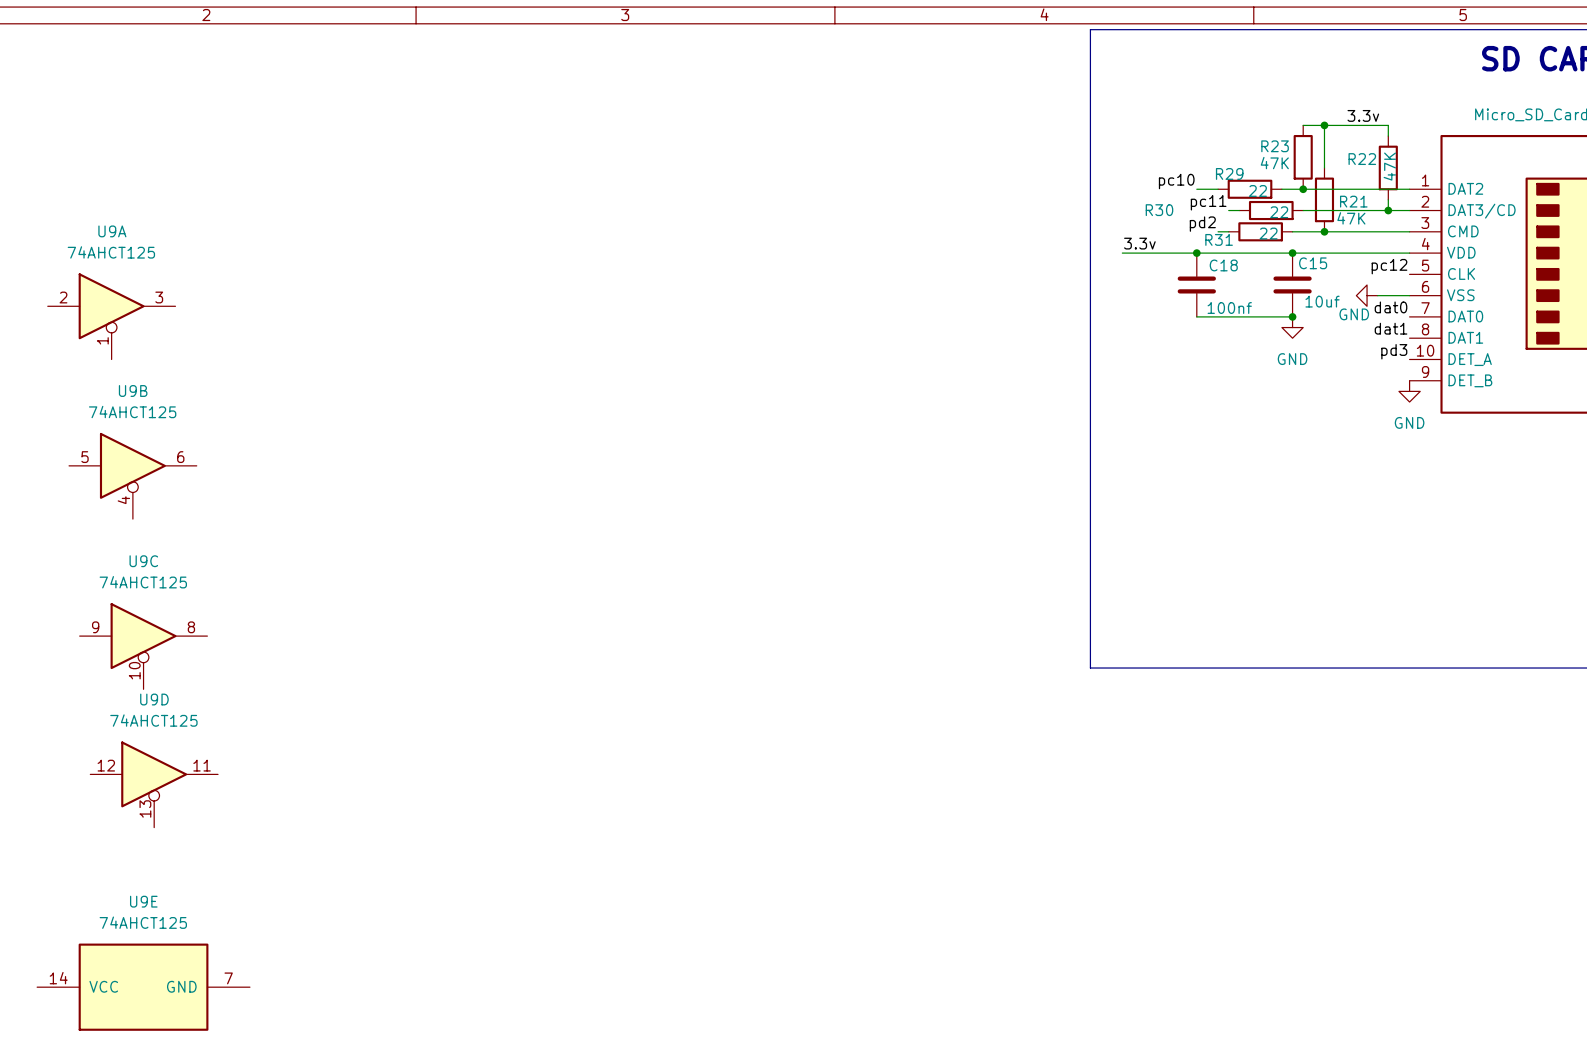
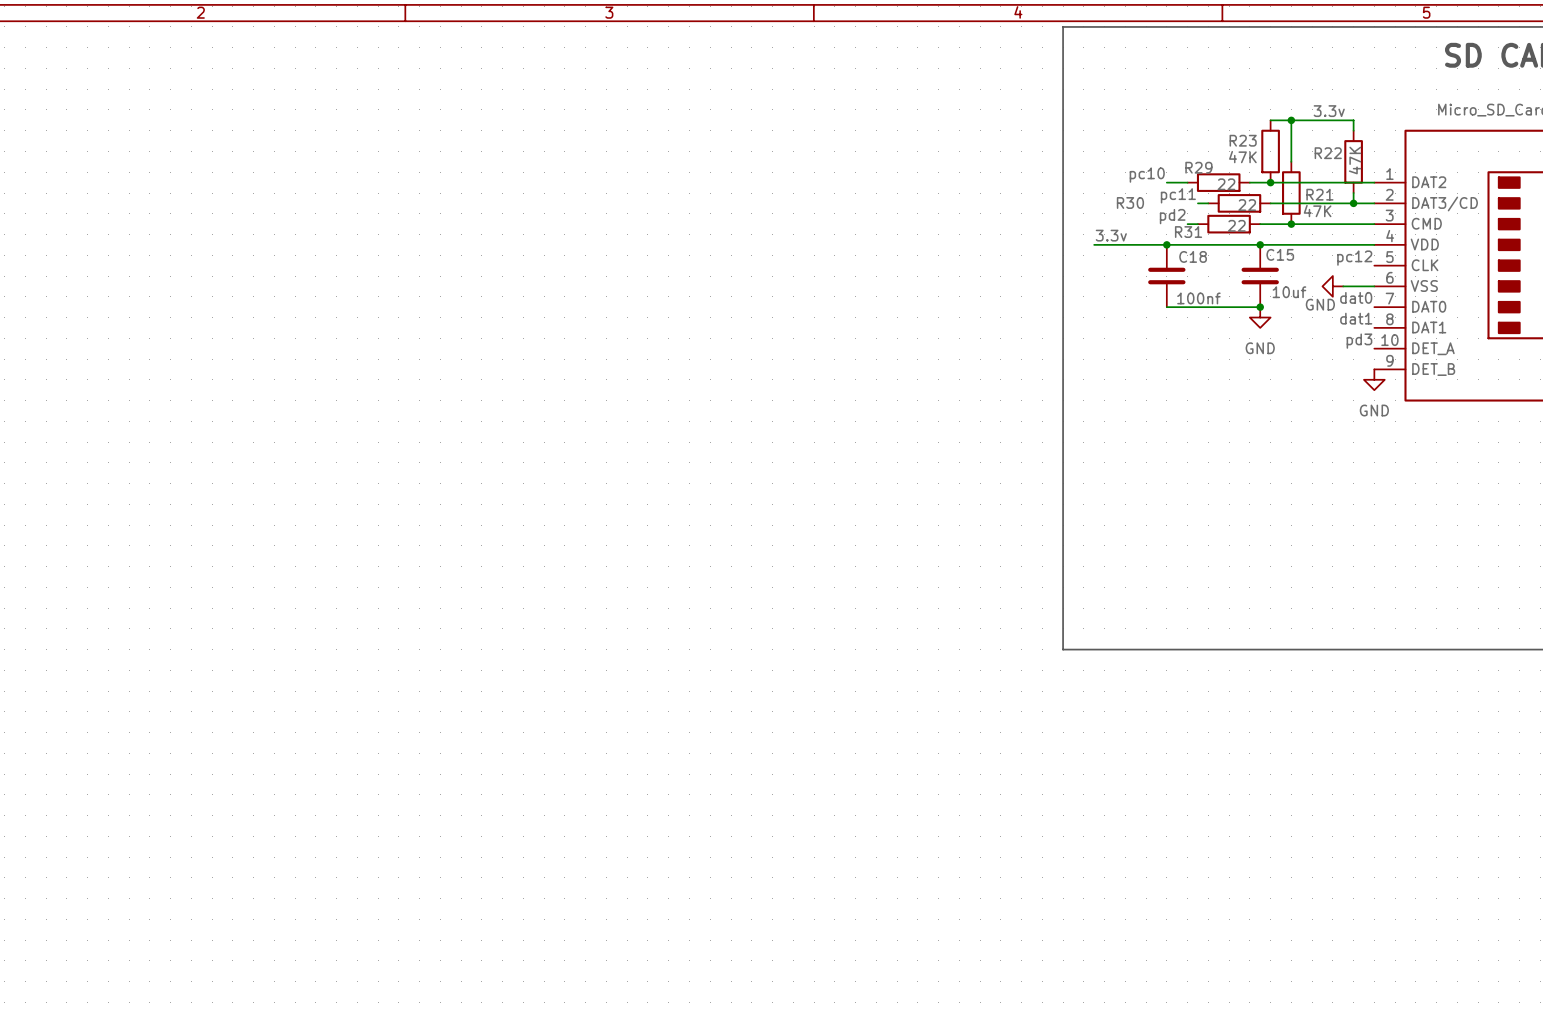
U9A: 74AHCT125 (111, 316) -> none
U9B: 74AHCT125 (132, 475) -> none
U9C: 74AHCT125 (143, 646) -> none
U9D: 74AHCT125 (154, 784) -> none
U9E: 74AHCT125 (143, 987) -> none

